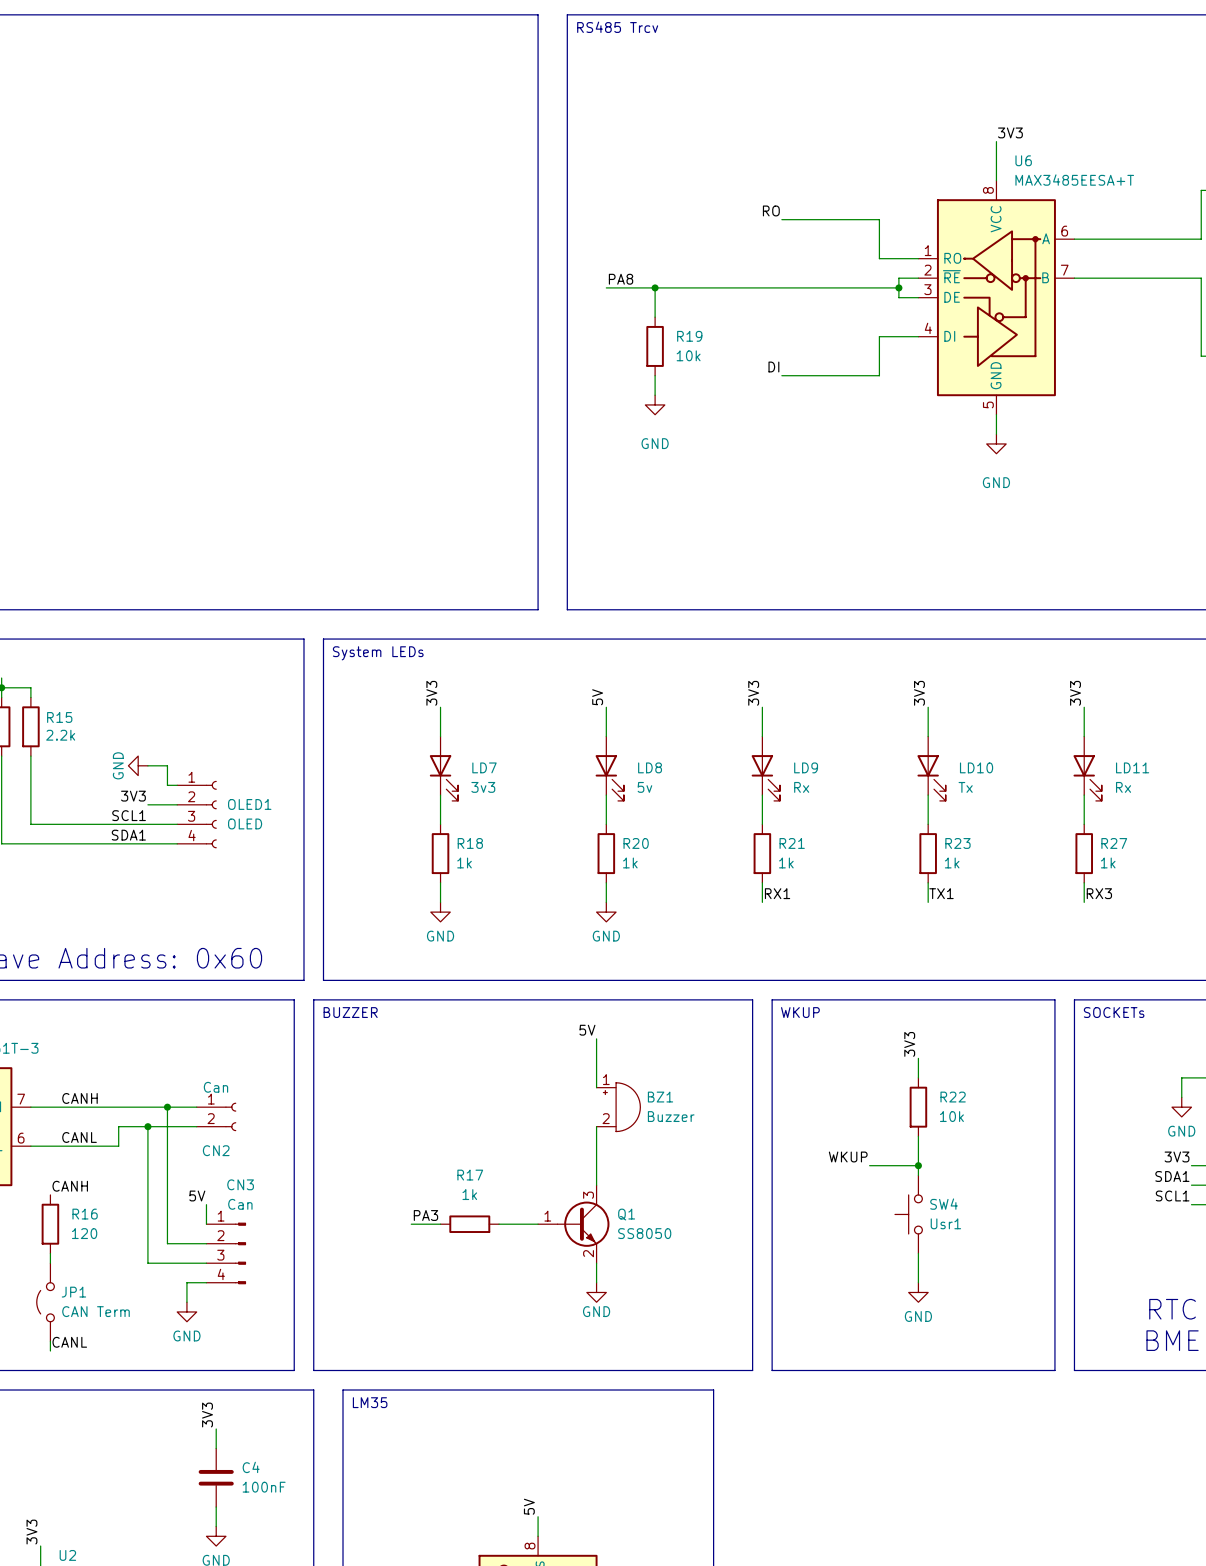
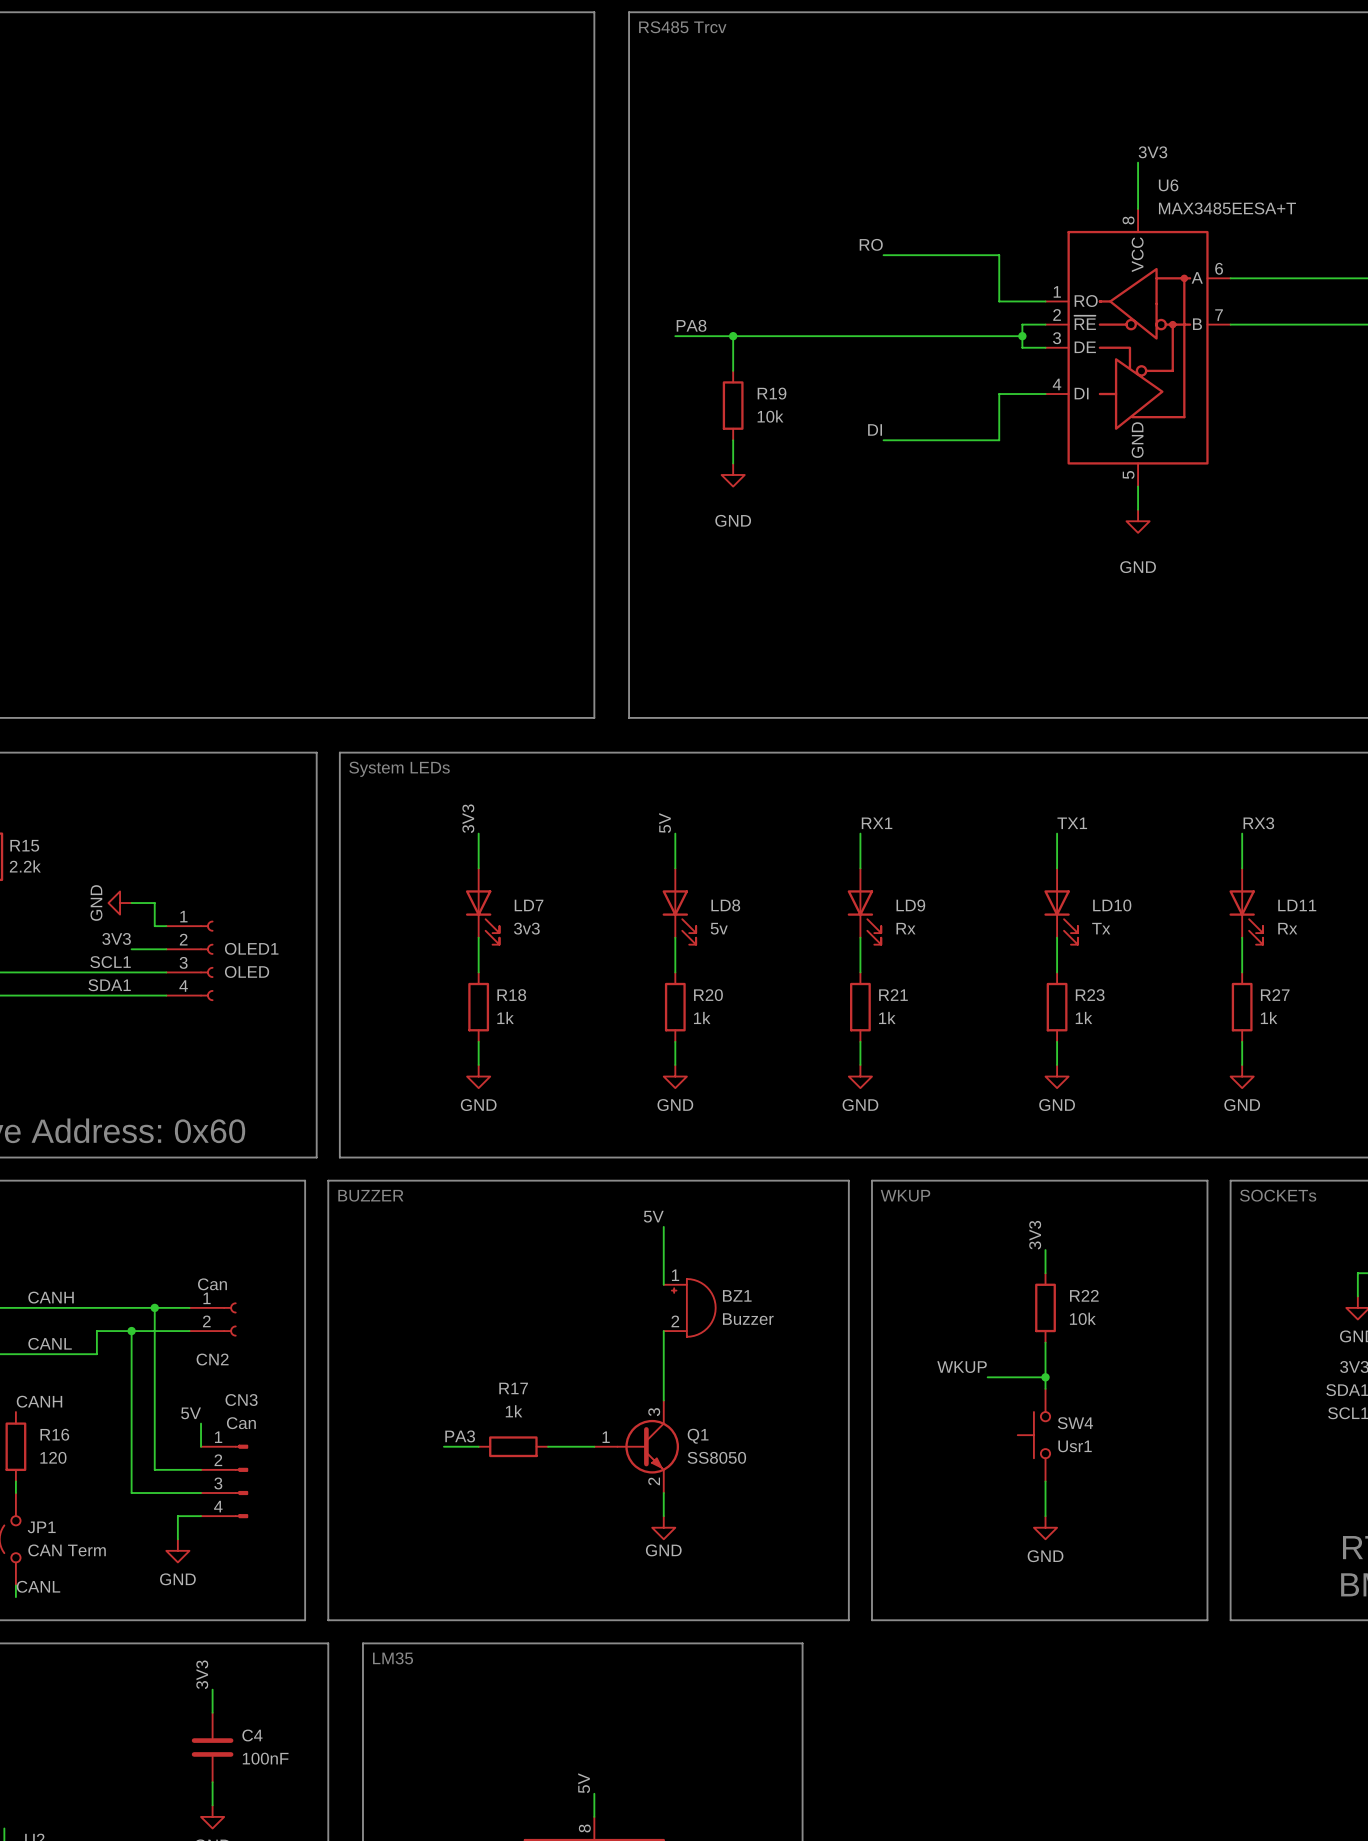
label: 3V3 (753, 693) -> RX1 (877, 823)
label: 3V3 (919, 693) -> TX1 (1072, 823)
label: 3V3 (1075, 693) -> RX3 (1258, 823)
label: RX1 (777, 893) -> none
label: TX1 (941, 893) -> none
label: RX3 (1099, 893) -> none
power symbol: none -> GND (860, 1076)
power symbol: none -> GND (1057, 1076)
power symbol: none -> GND (1242, 1076)

